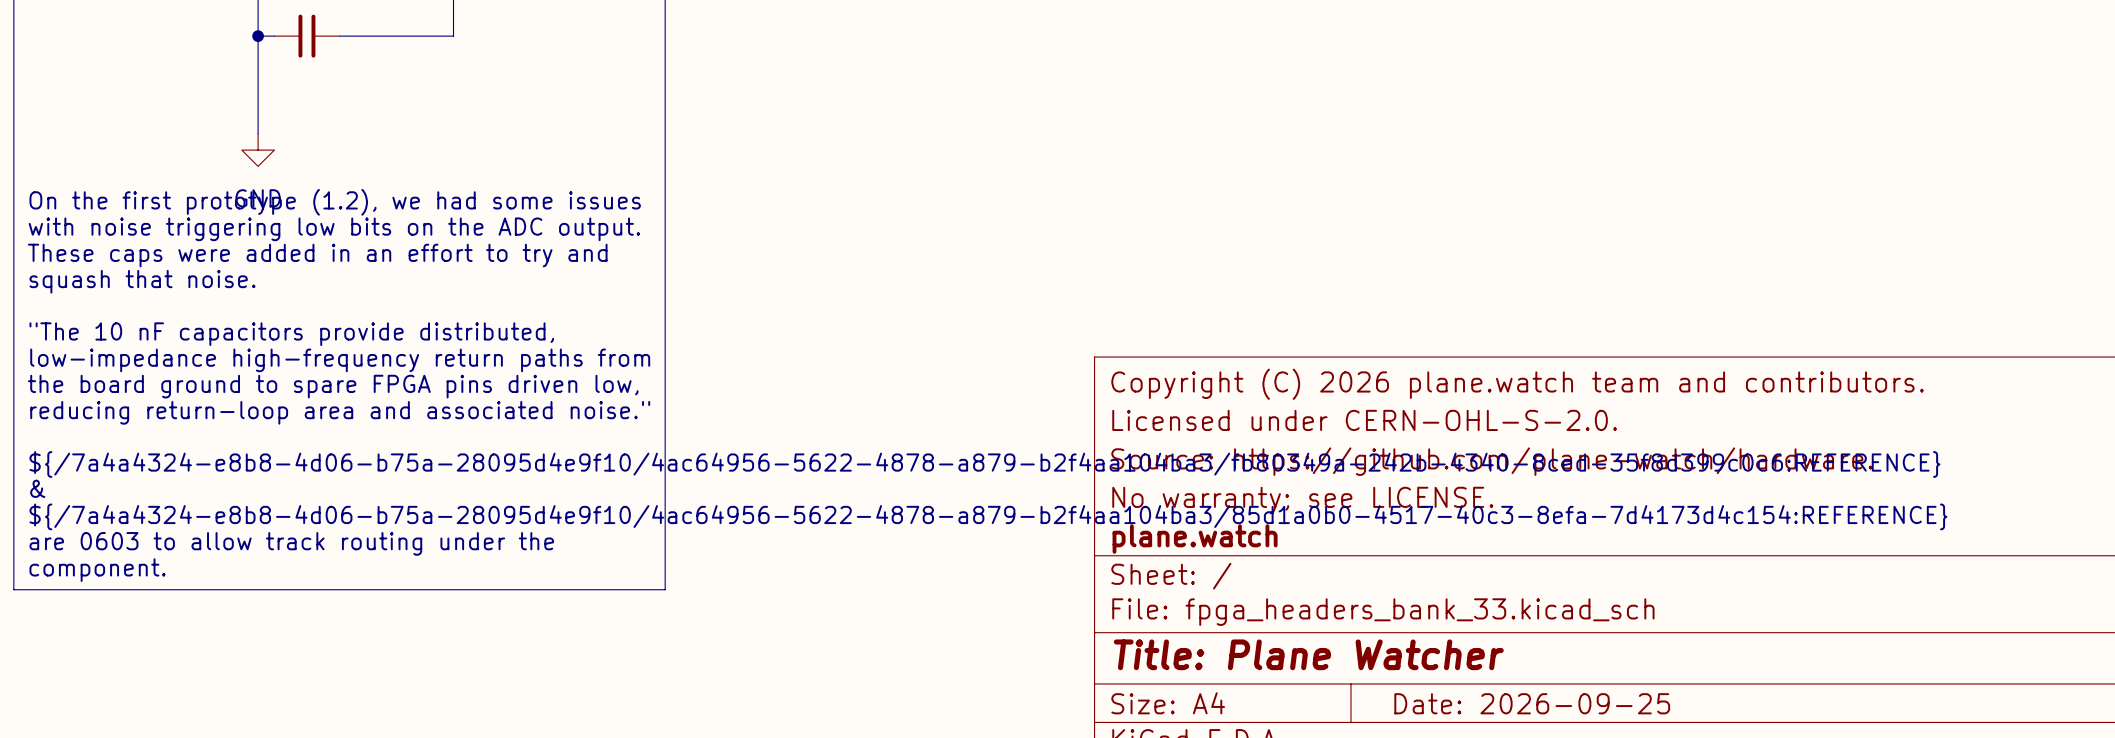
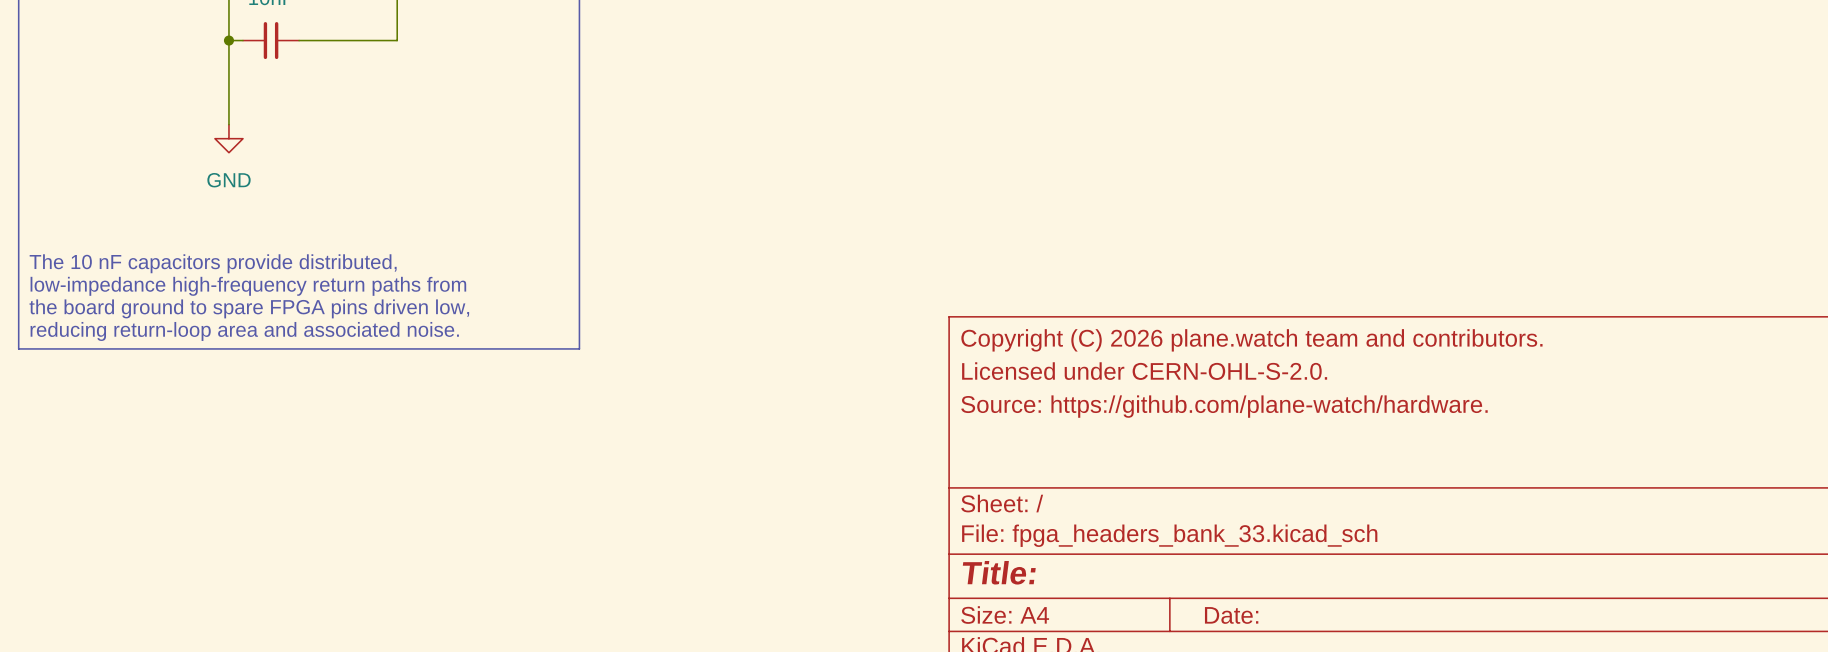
text: On the first prototype (1.2), we had some issues (335, 202) -> none
text: with noise triggering low bits on the ADC output. (334, 229) -> none
text: These caps were added in an effort to try and (317, 255) -> none
text: squash that noise. (142, 281) -> none
text: none -> The 10 nF capacitors provide distributed, (213, 263)
text: "The 10 nF capacitors provide distributed, (291, 334) -> none
text position: low-impedance high-frequency return paths from (340, 360) -> low-impedance high-frequency return paths from (248, 286)
text: none -> reducing return-loop area and associated noise. (244, 331)
text position: the board ground to spare FPGA pins driven low, (333, 386) -> the board ground to spare FPGA pins driven low, (249, 308)
line: (13, 394) (13, 589) (665, 589) (665, 394) -> (18, 348) (579, 348)
text: reducing return-loop area and associated noise." (340, 412) -> none
text: ${/7a4a4324-e8b8-4d06-b75a-28095d4e9f10/4ac64956-5622-4878-a879-b2f4aa104ba3/fb80349a-242b-4340-8ced-35f8d399c0c6:REFERENCE} (984, 464) -> none
text: & (37, 488) -> none
title block: No warranty; see LICENSE. (1302, 500) -> none
text: ${/7a4a4324-e8b8-4d06-b75a-28095d4e9f10/4ac64956-5622-4878-a879-b2f4aa104ba3/85d1a0b0-4517-40c3-8efa-7d4173d4c154:REFERENCE} (988, 516) -> none
title block: plane.watch (1195, 539) -> none
text: are 0603 to allow track routing under the (291, 543) -> none
text: component. (97, 570) -> none
title block: Title: Plane Watcher (1308, 654) -> Title: (999, 572)
title block: Date: 2026-09-25 (1532, 703) -> Date: (1231, 615)

